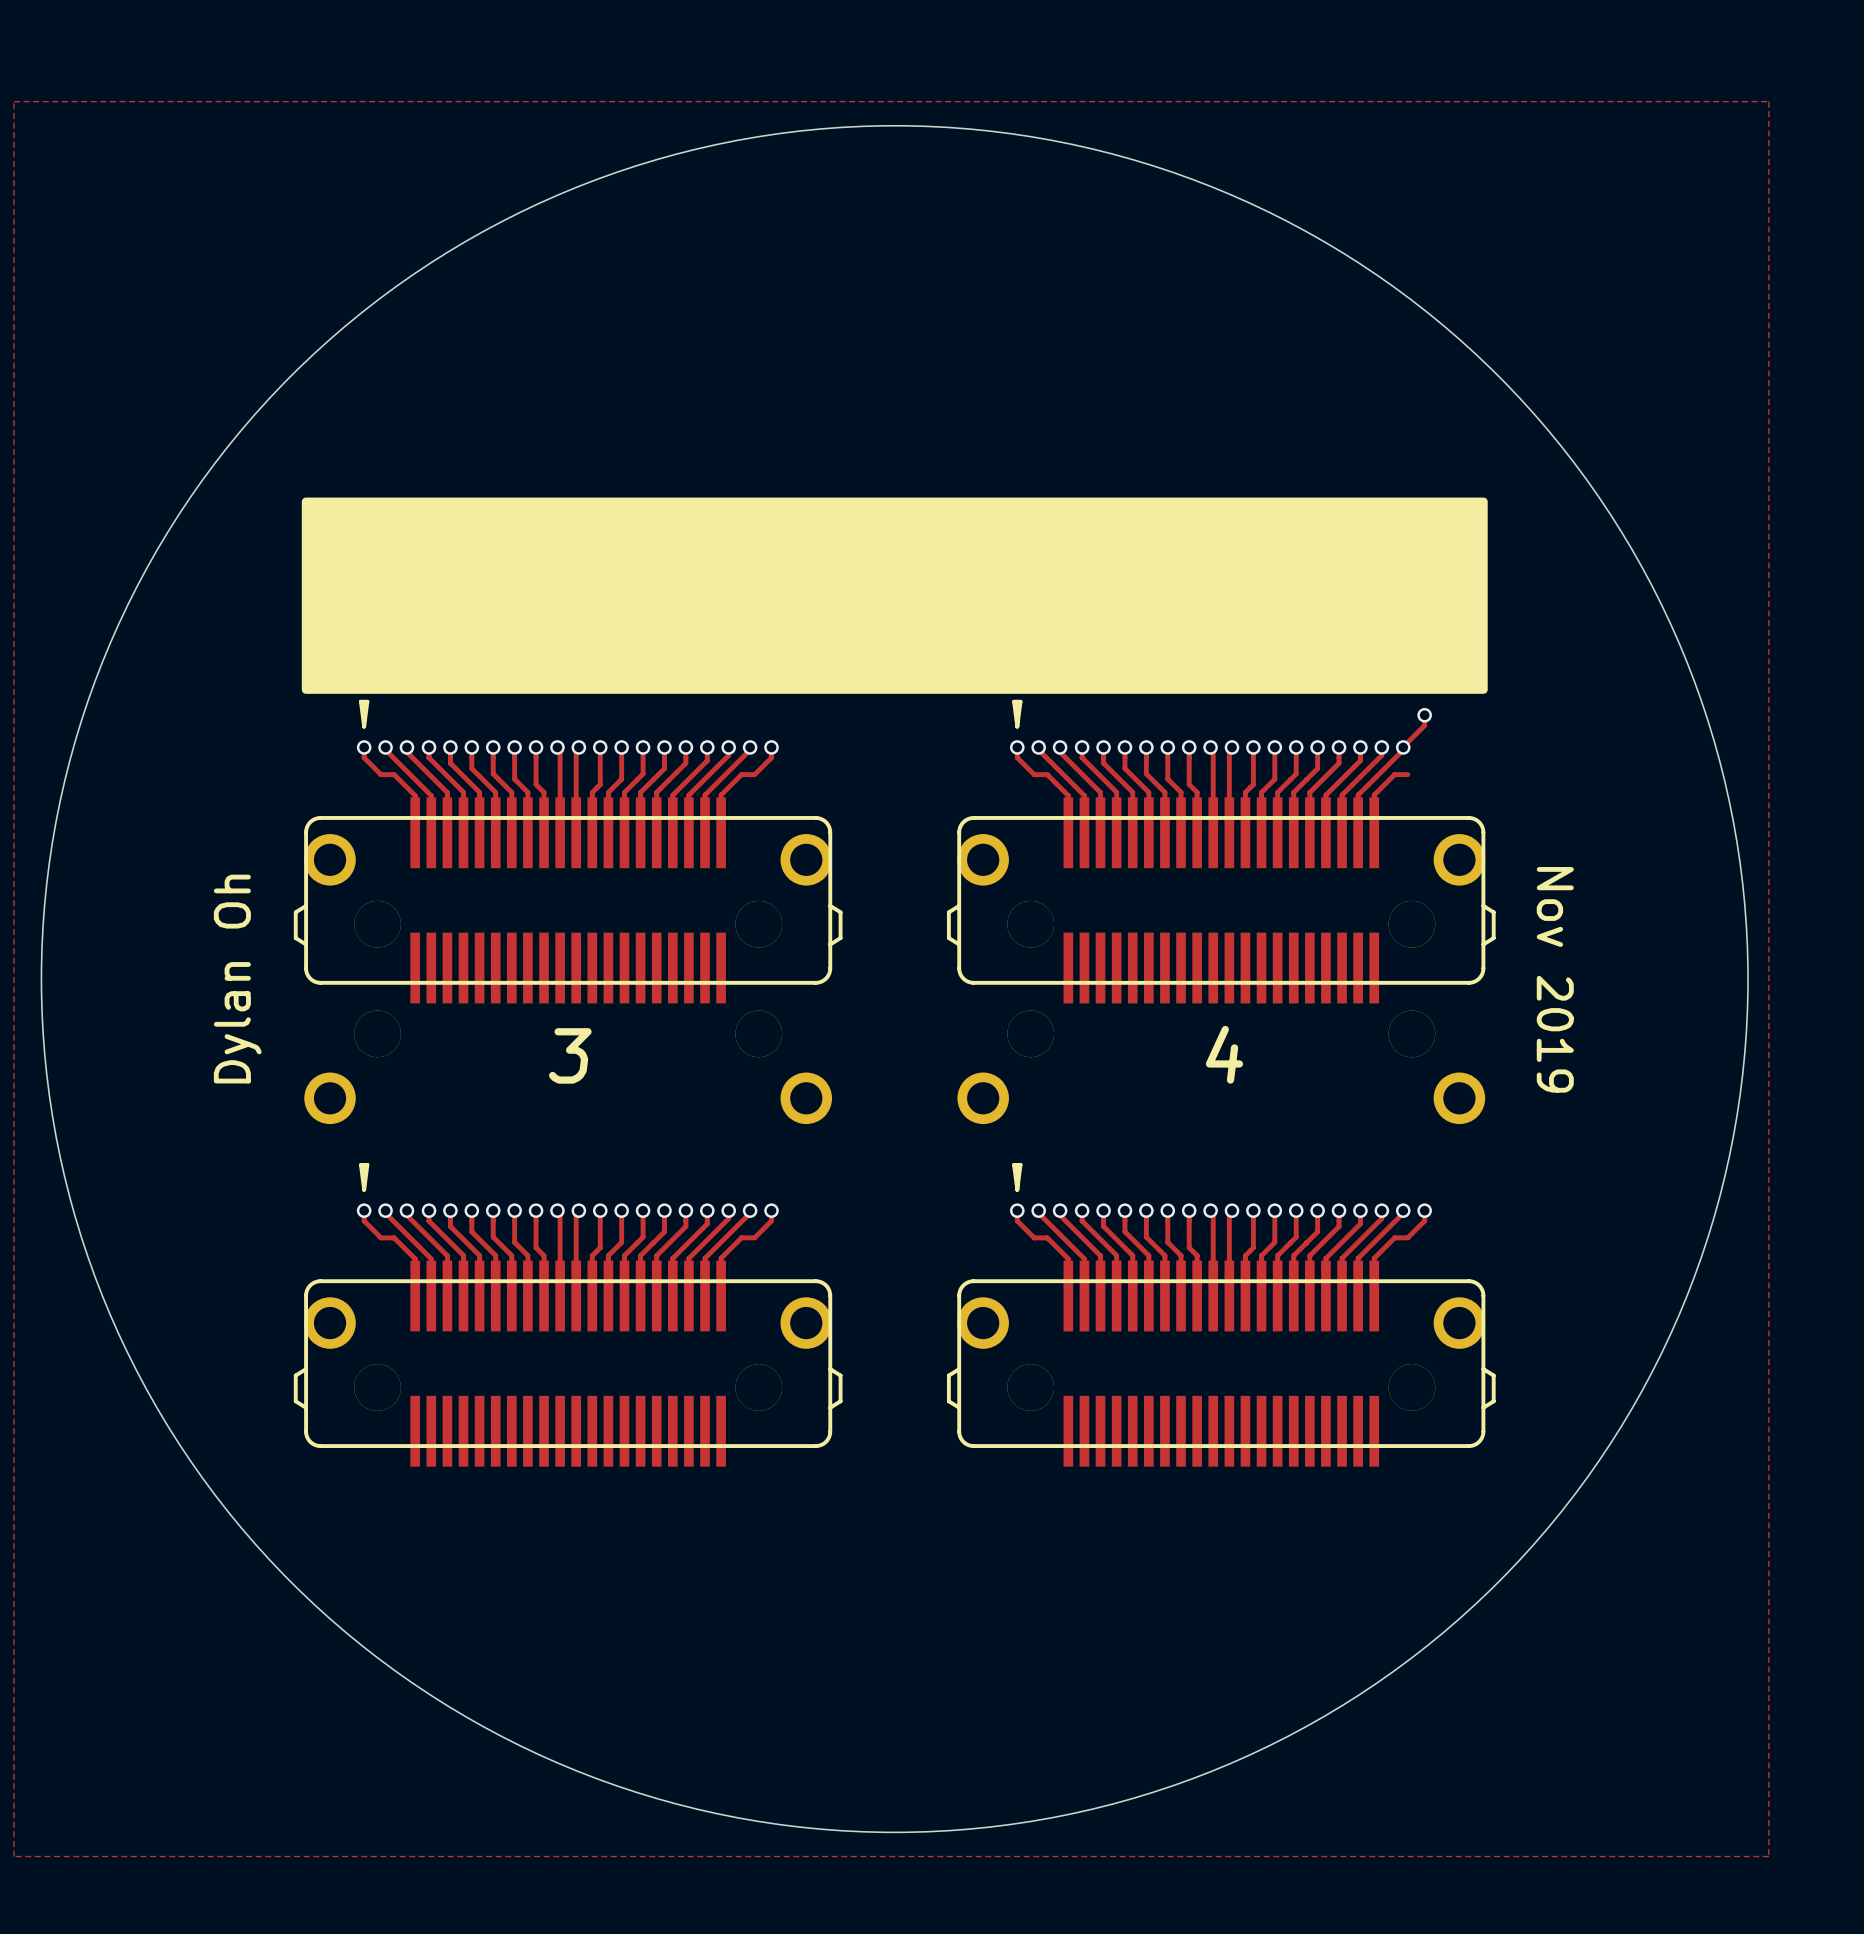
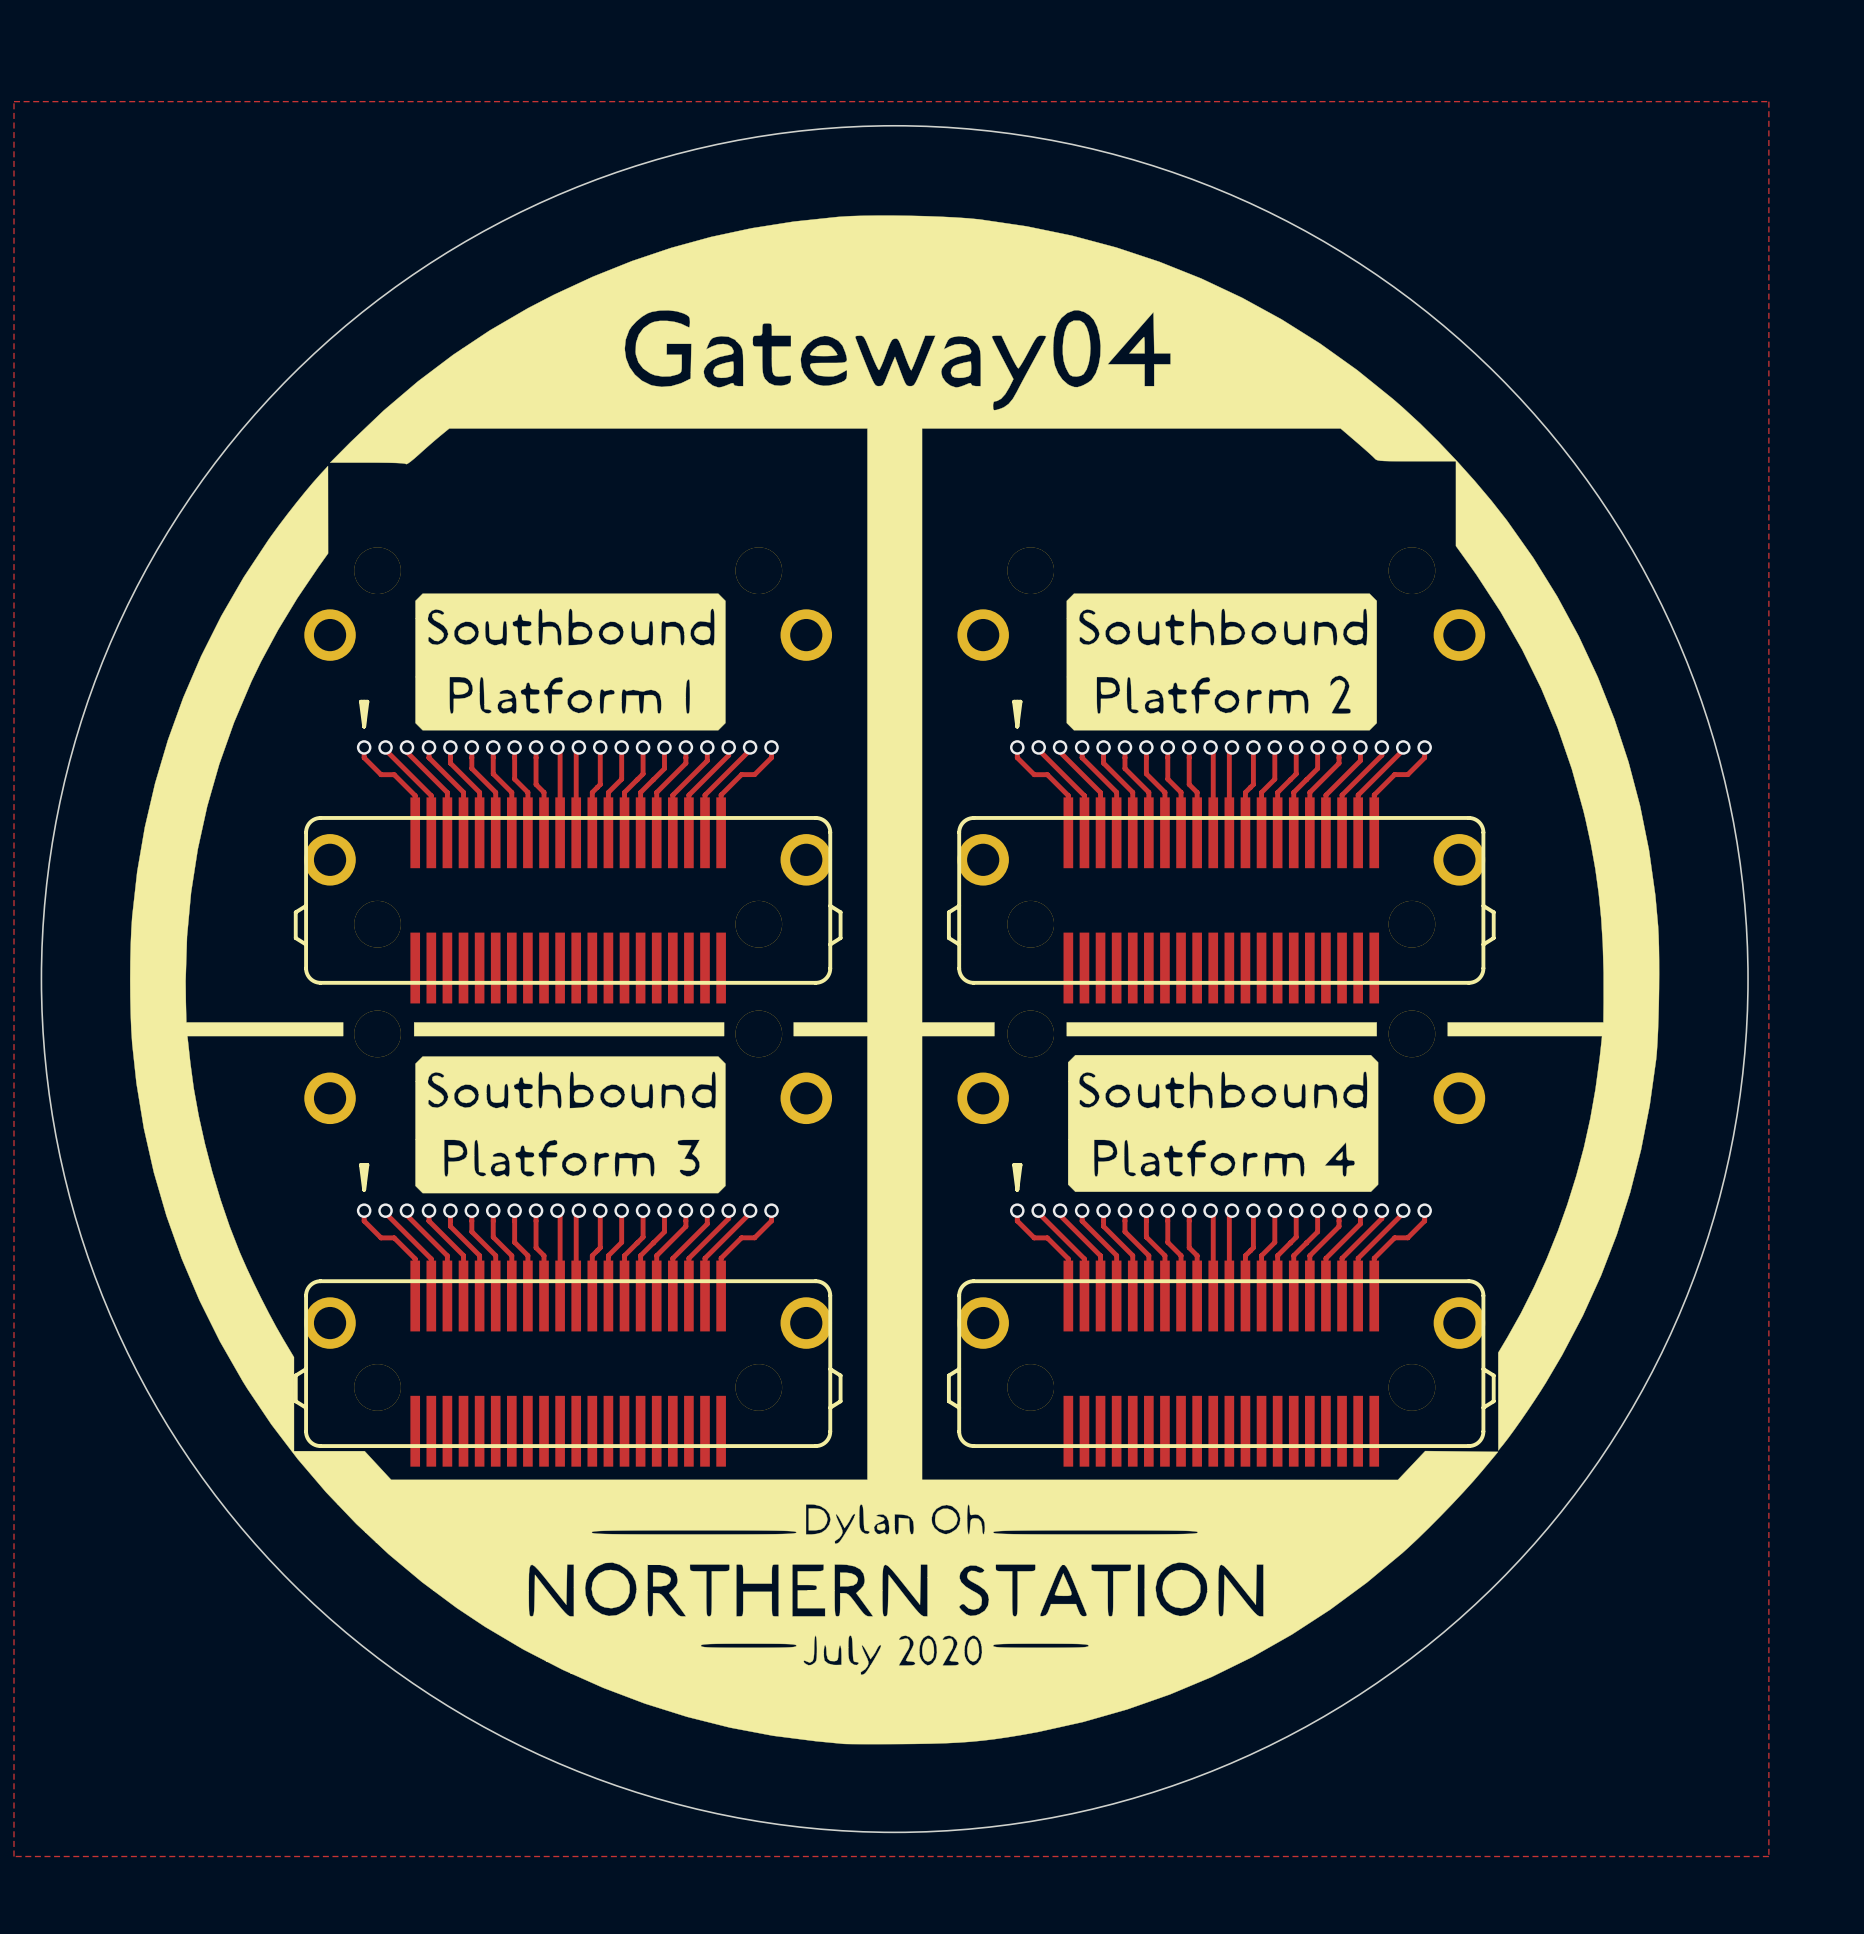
drawing: none -> [130, 215, 1660, 1745]
drawing: [301, 497, 1488, 694] -> none
track: (1424, 715) (1424, 725) (1407, 742) -> (1424, 747) (1424, 757) (1407, 774)
via position: (1424, 715) -> (1424, 747)
text: Dylan Oh (237, 979) -> none
text: Nov 2019 (1555, 979) -> none
text: 4 (1224, 1054) -> none
text: 3 (570, 1055) -> none

